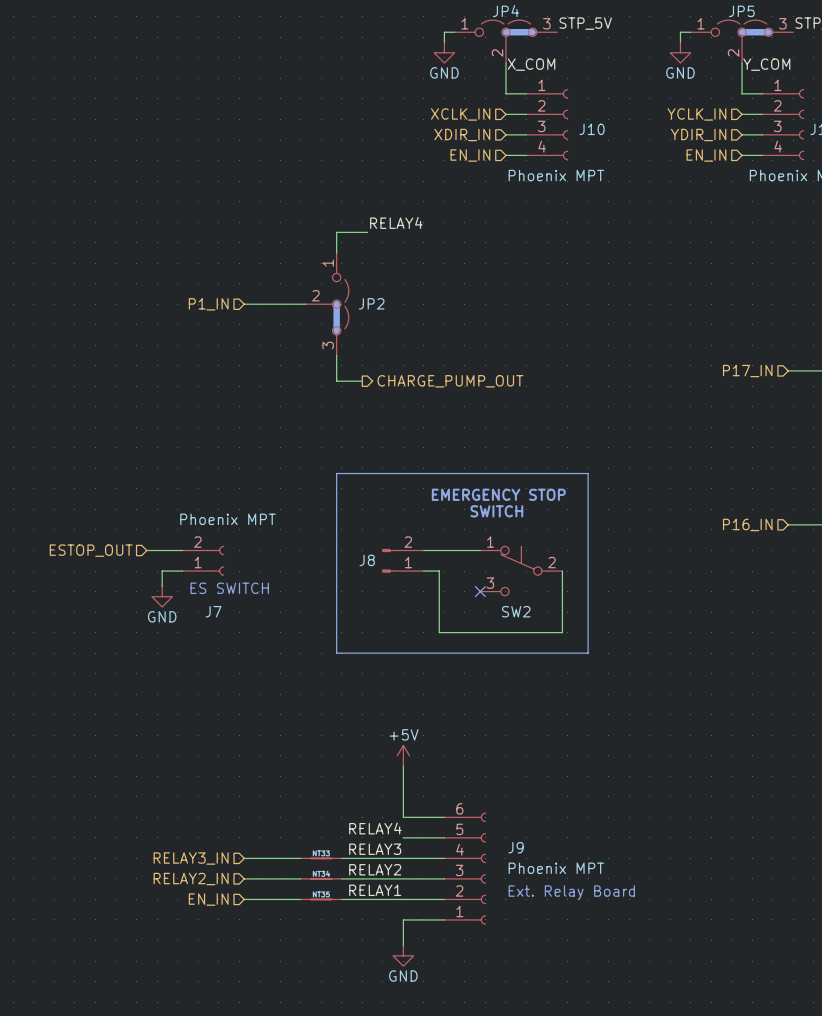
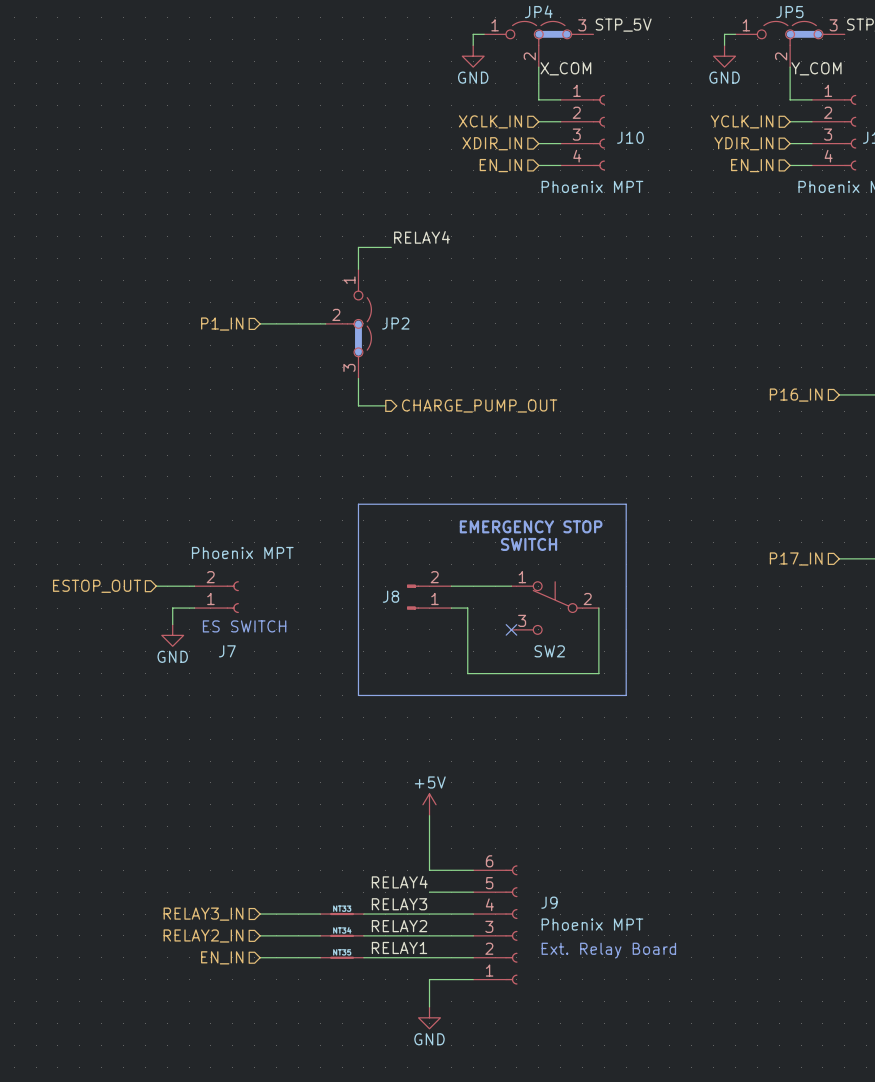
hierarchical label: P17_IN (747, 371) -> P16_IN (796, 395)
hierarchical label: P16_IN (747, 524) -> P17_IN (796, 558)

